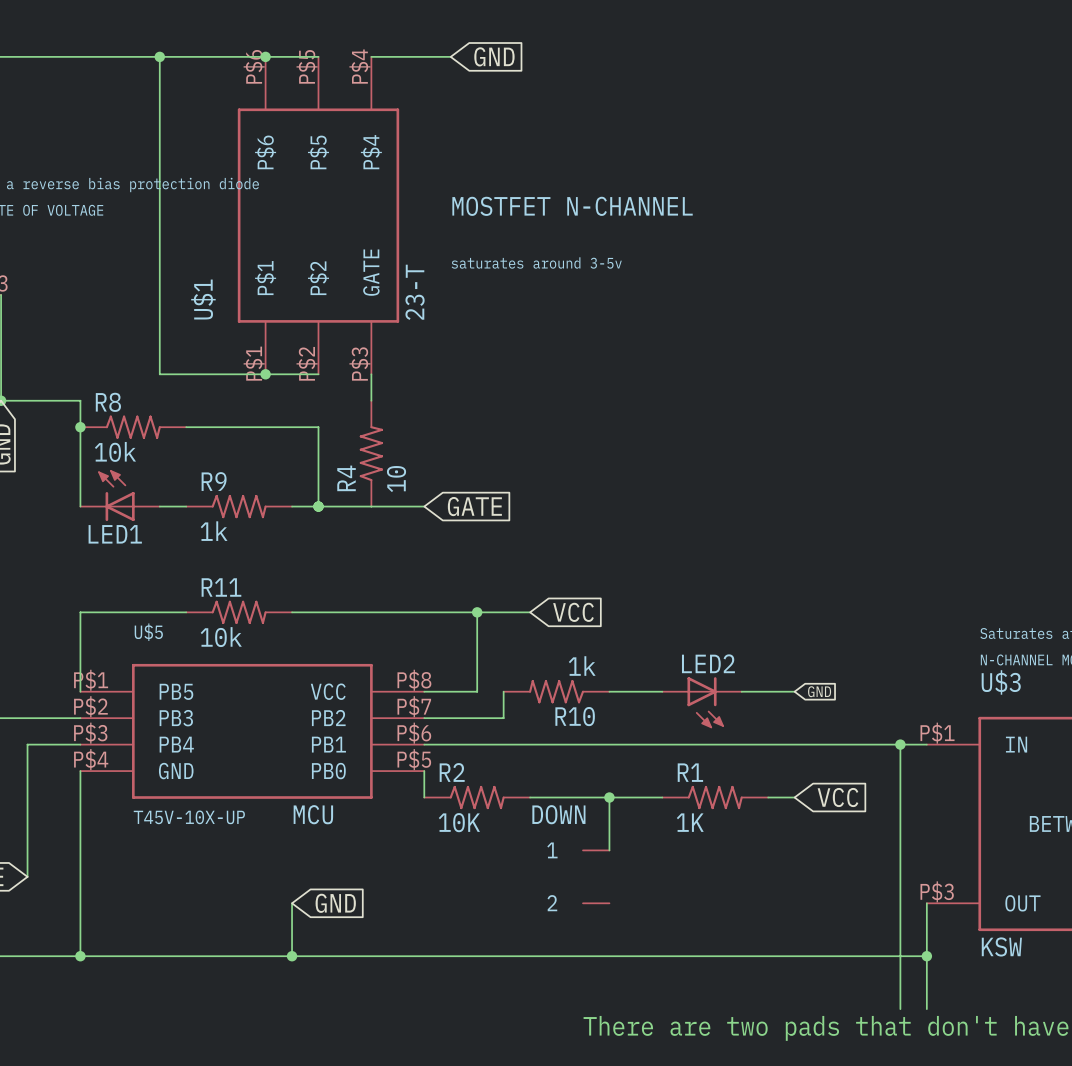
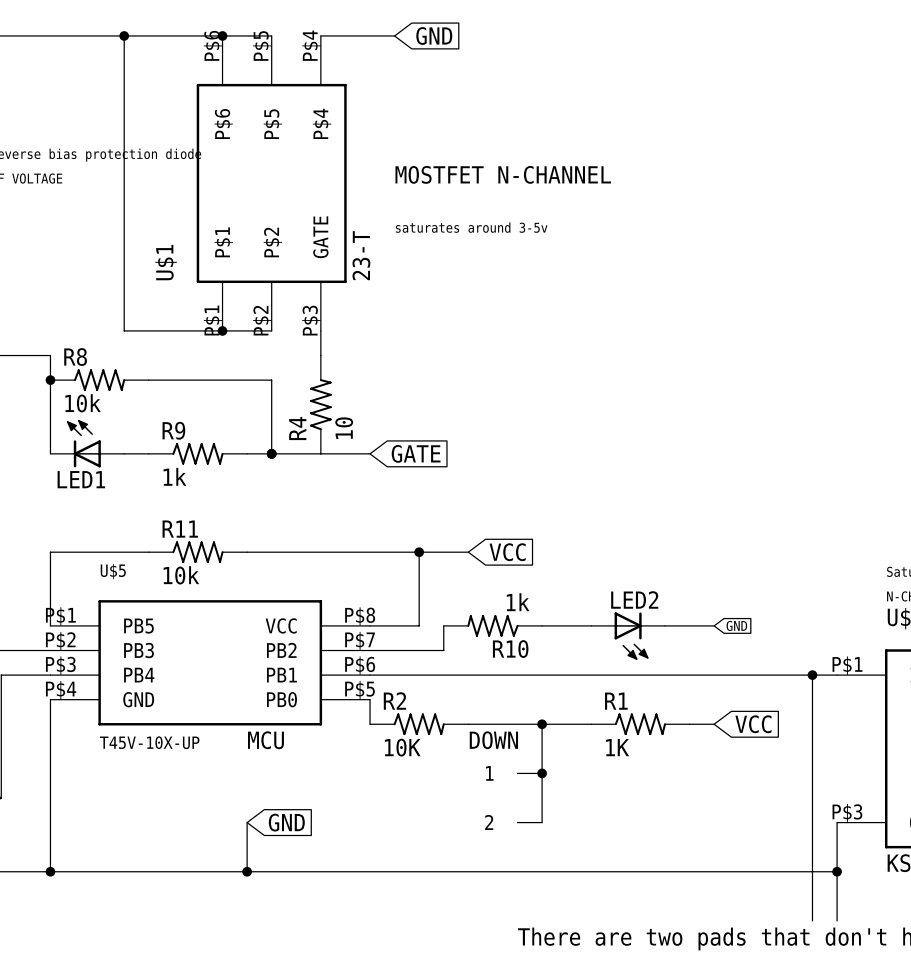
wire: none -> (542, 773) (542, 822)
junction: none -> (542, 773)

